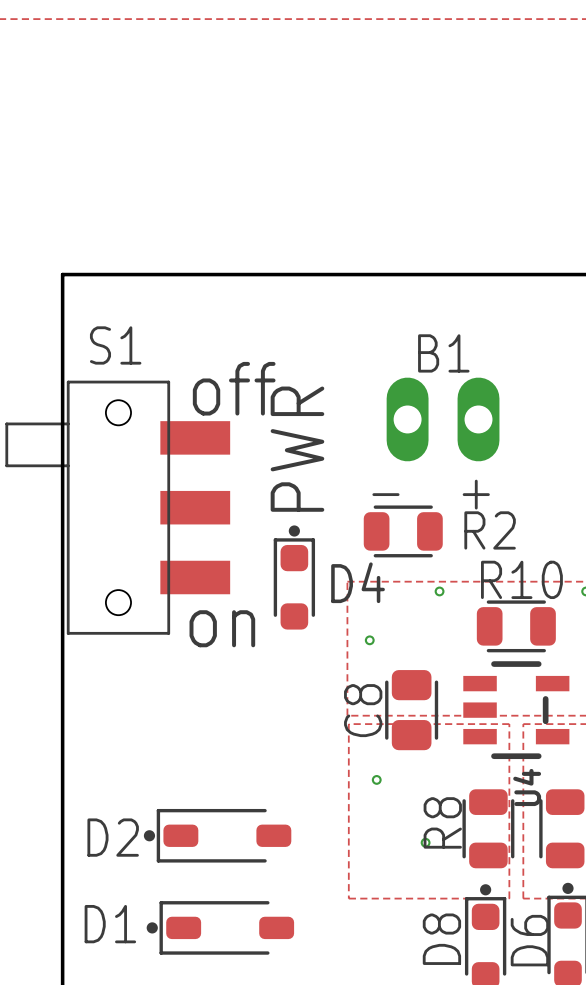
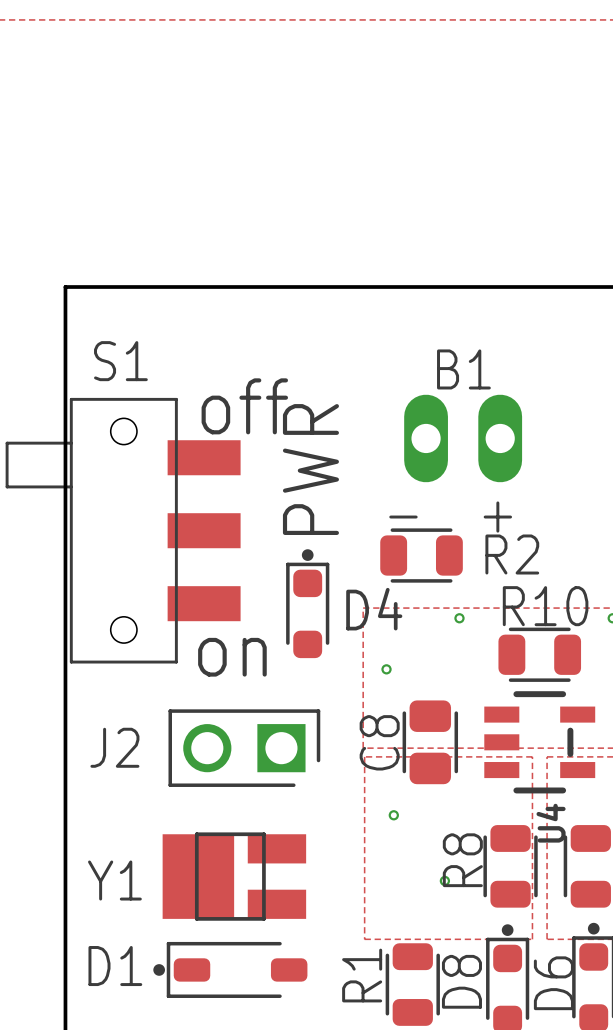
J2: none -> (244, 748)
D2: (217, 835) -> none
Y1: none -> (234, 876)
R1: none -> (412, 984)

